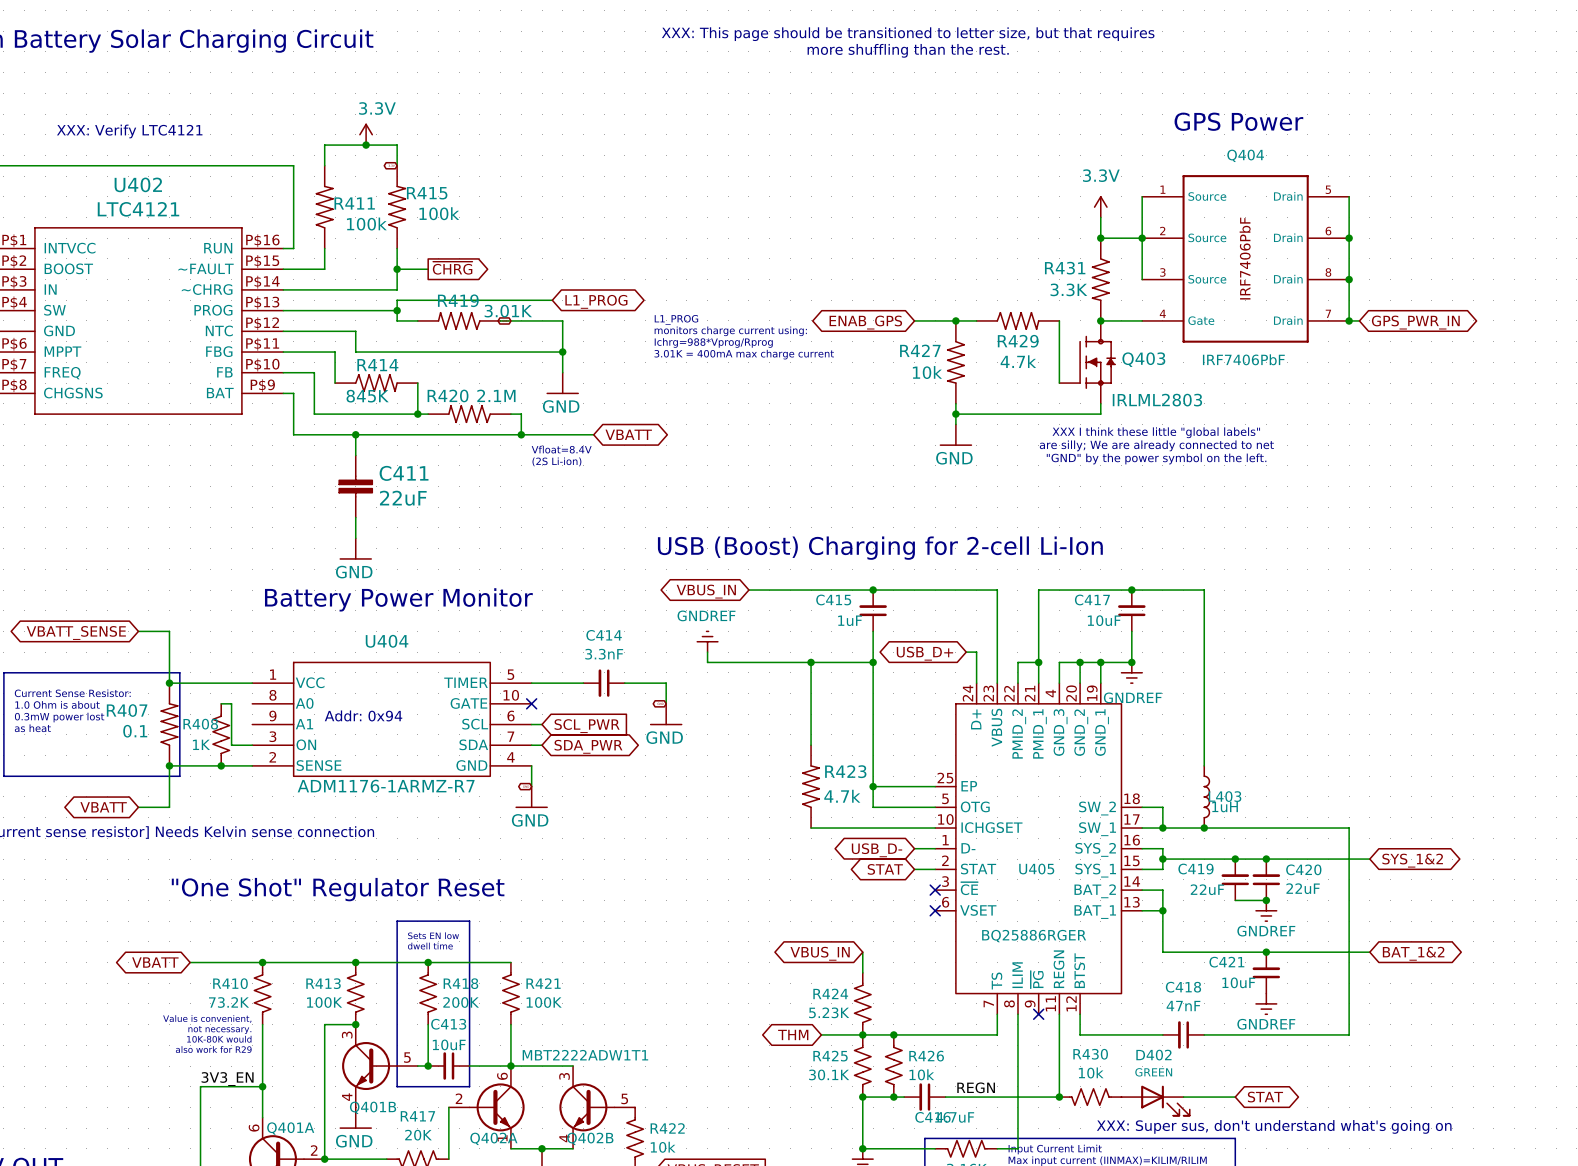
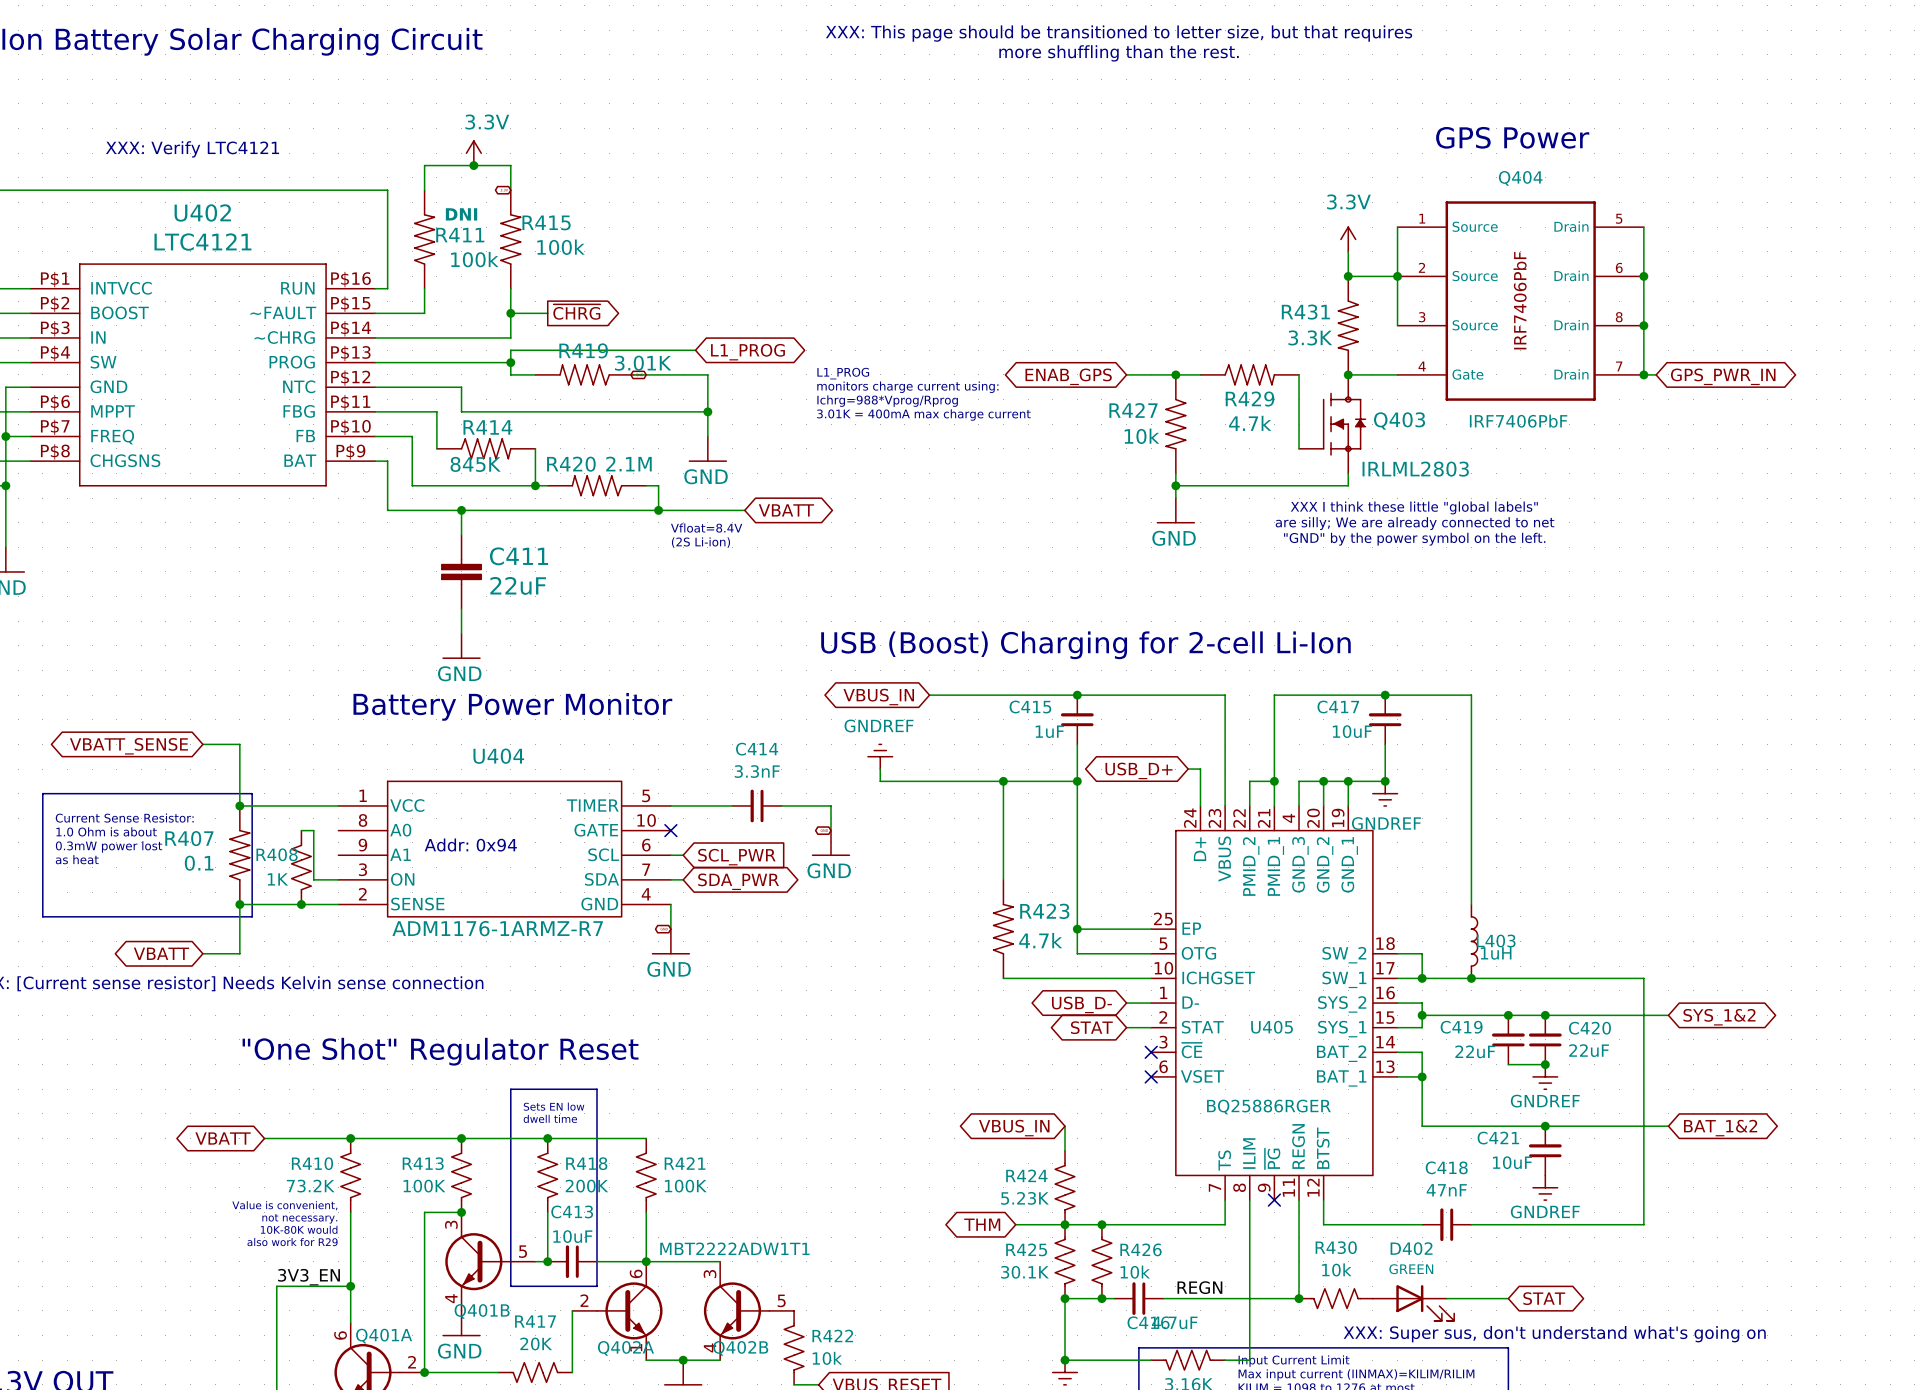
R411 text: none -> DNI (461, 214)

